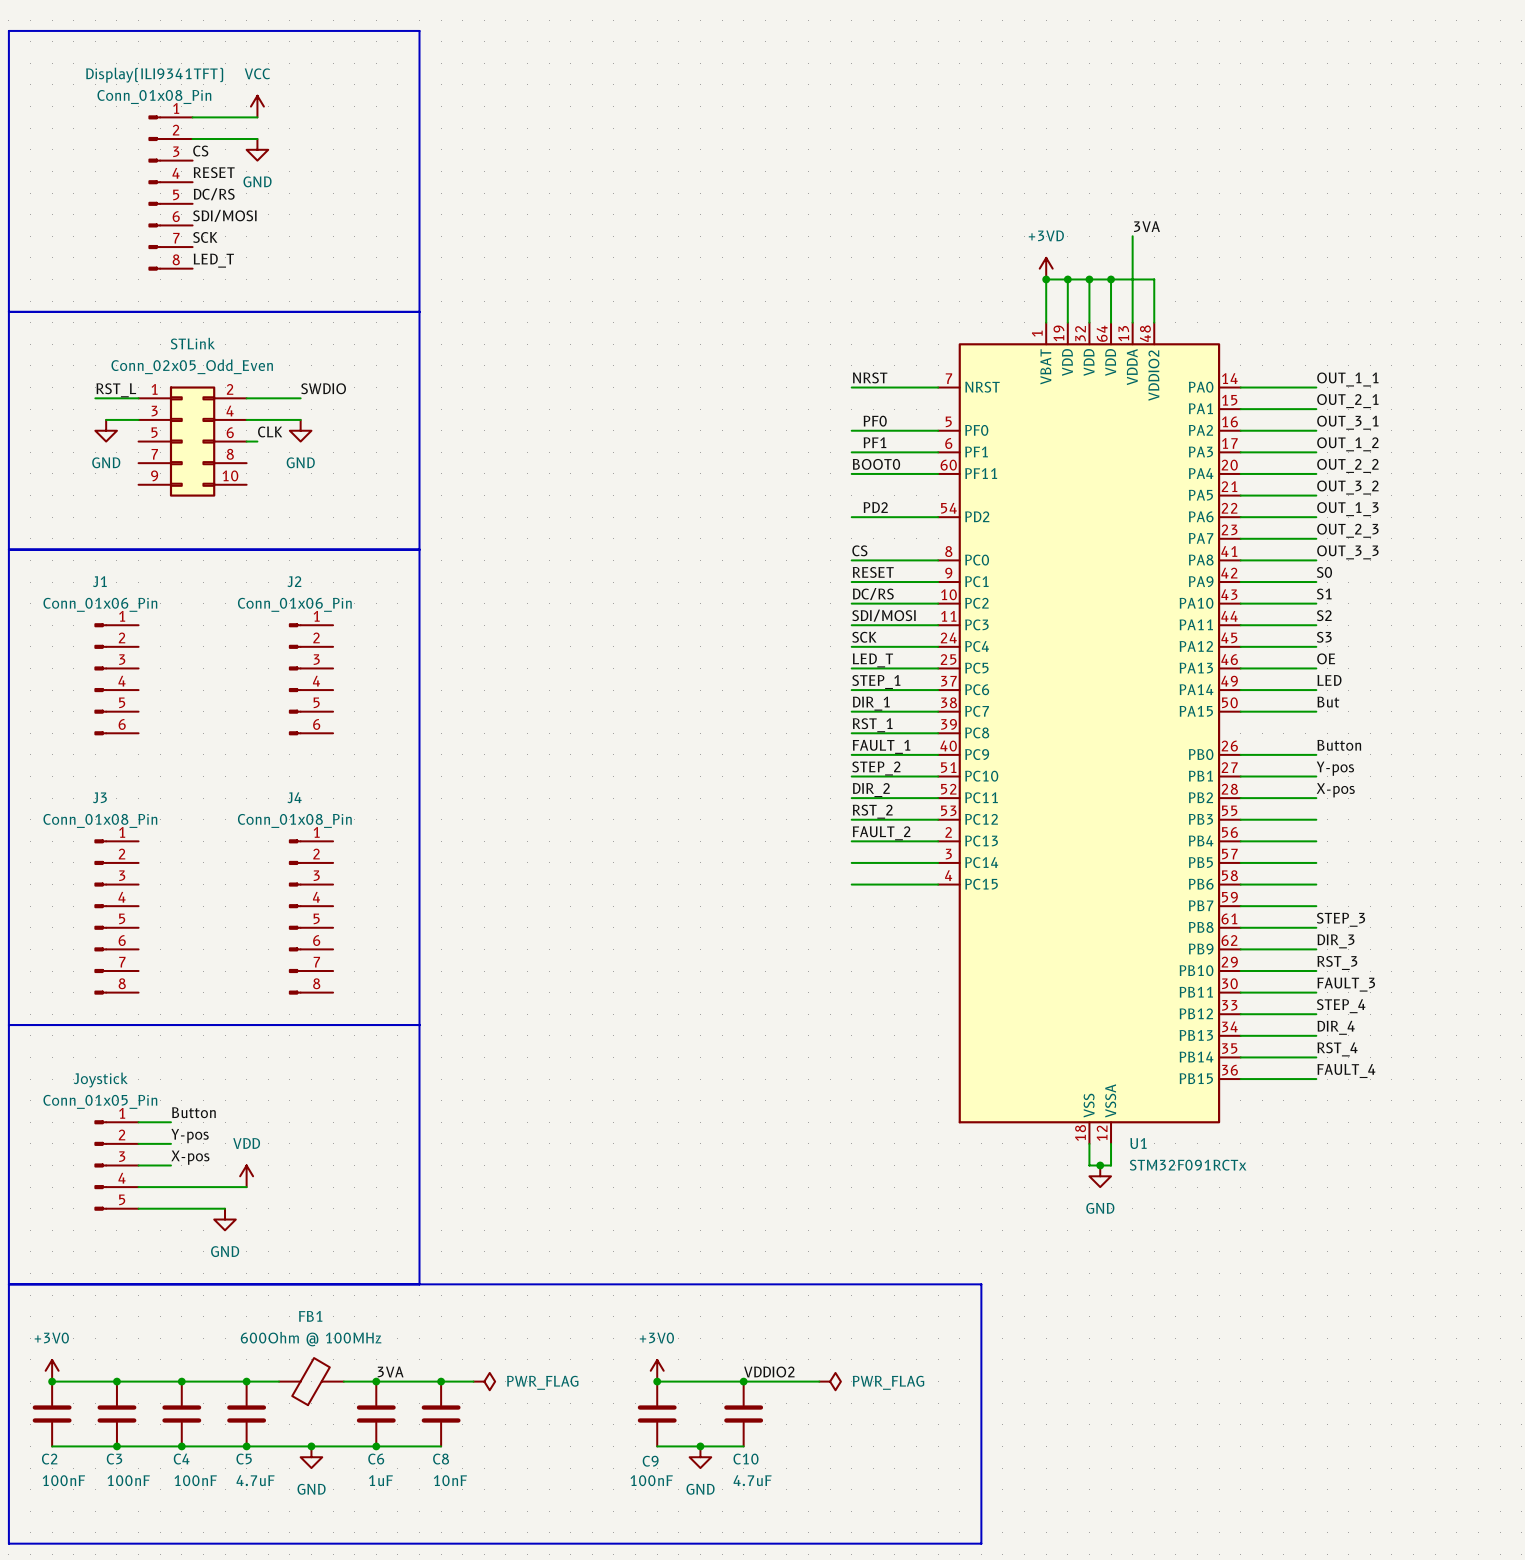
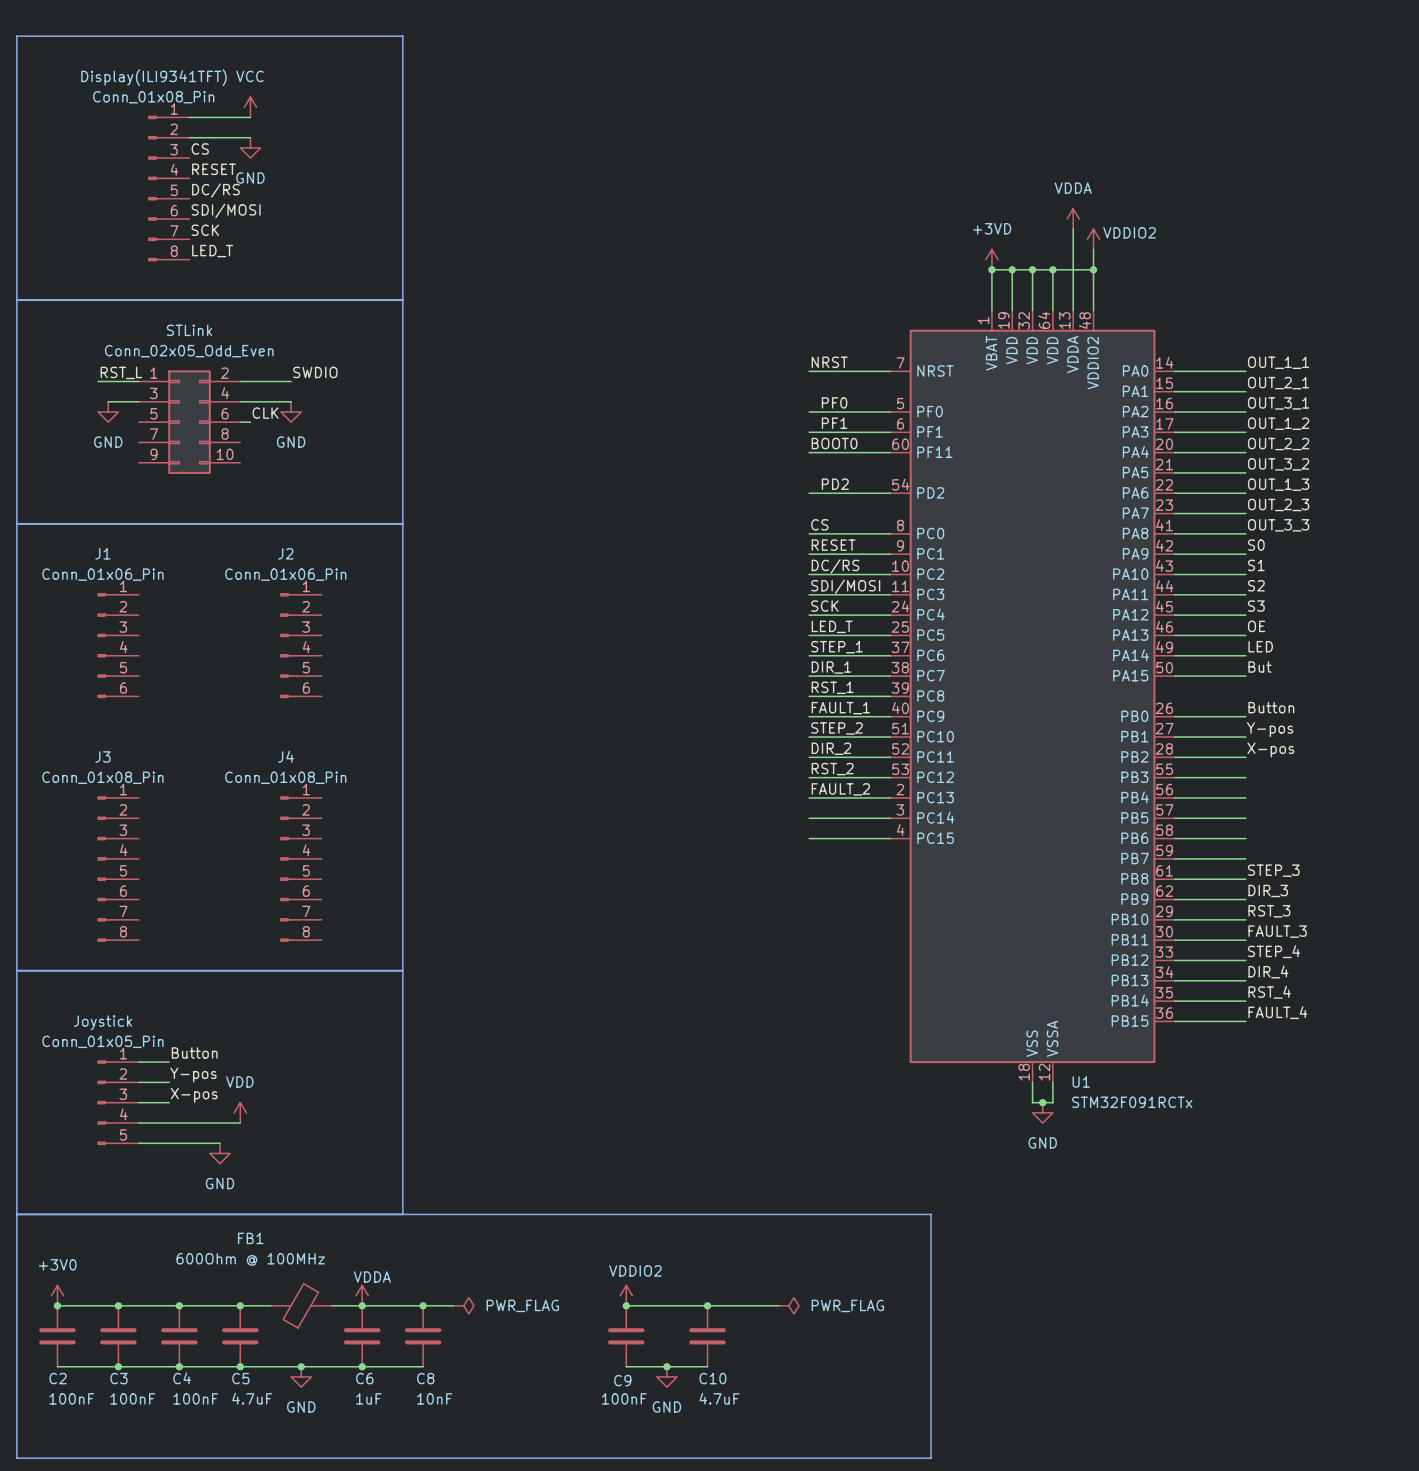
power symbol: none -> VDDA (1073, 219)
label: 3VA (1146, 226) -> none
power symbol: none -> VDDIO2 (1093, 239)
wire: none -> (1093, 249) (1093, 269)
junction: none -> (1093, 269)
FB1 name position: FB1 (310, 1316) -> FB1 (250, 1238)
FB1 value position: 600Ohm @ 100MHz (311, 1339) -> 600Ohm @ 100MHz (250, 1259)
power symbol: none -> VDDA (362, 1295)
power symbol: +3V0 (657, 1370) -> VDDIO2 (626, 1295)
label: 3VA (390, 1372) -> none
label: VDDIO2 (769, 1372) -> none

